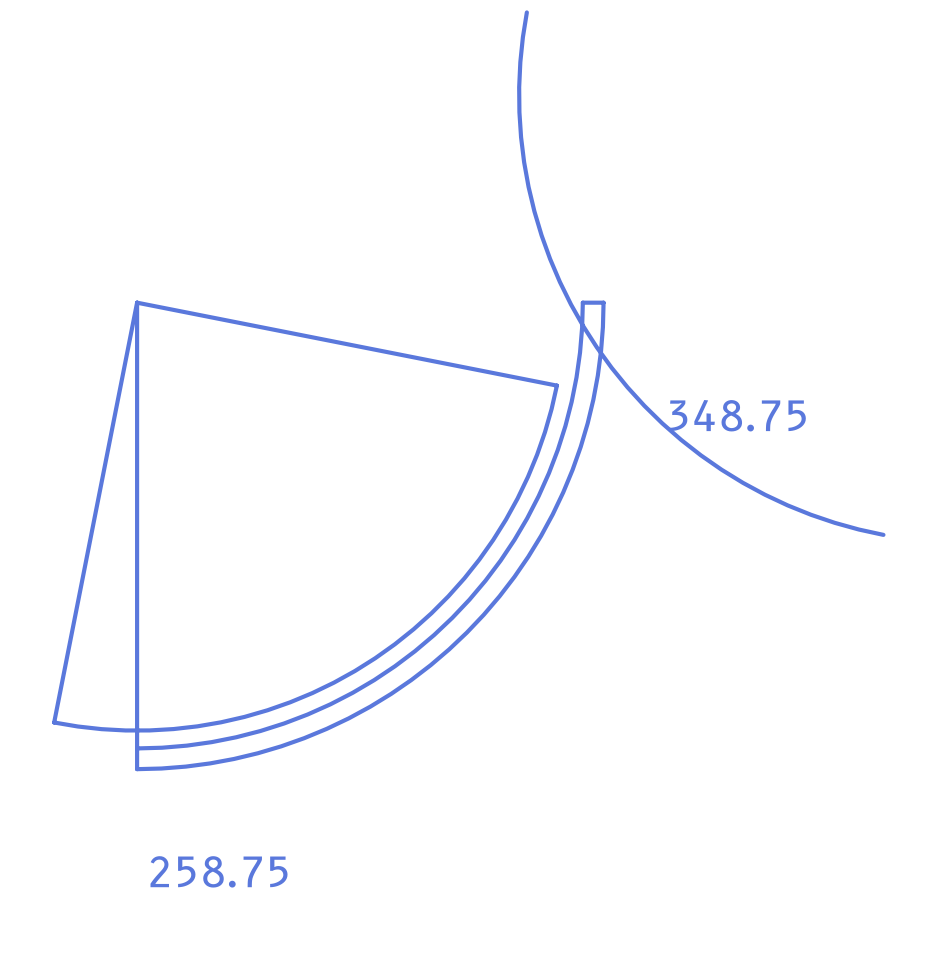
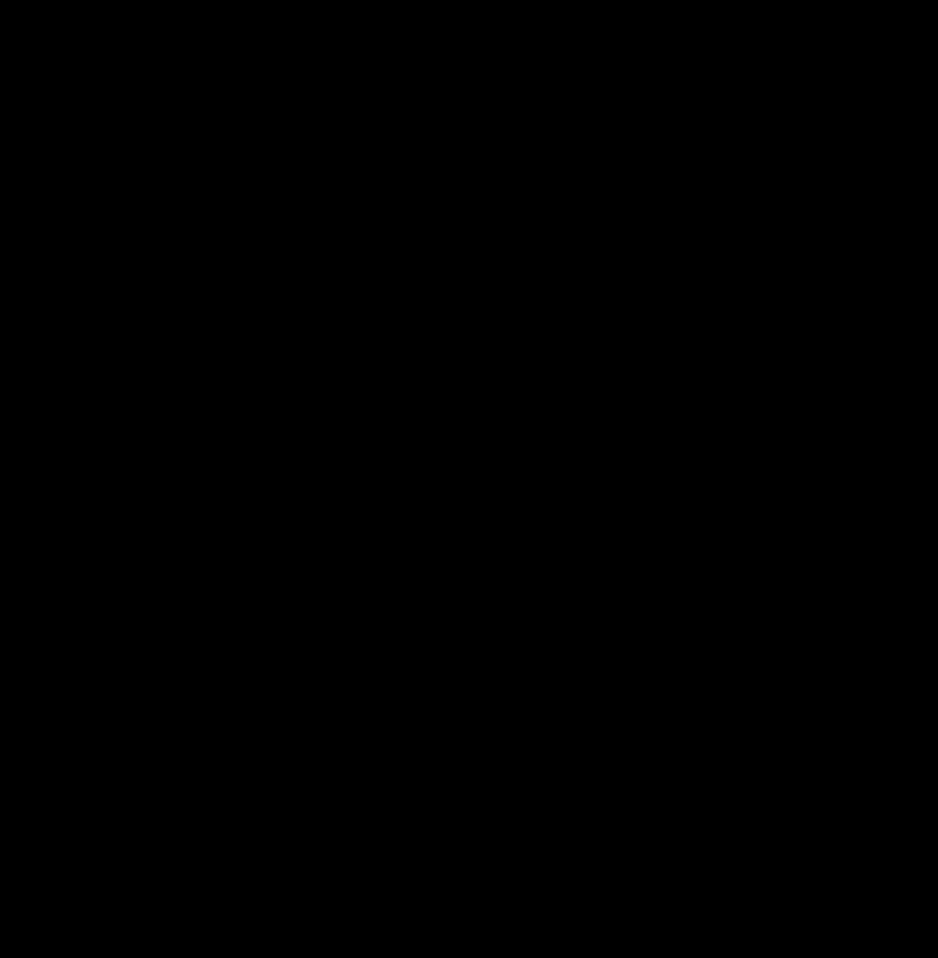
bottom track: (526, 12) (520, 62) (519, 112) (528, 186) (541, 235) (559, 282) (596, 347) (627, 387) (662, 423) (721, 469) (787, 505) (834, 522) (883, 534) -> none
bottom track: (137, 302) (137, 769) (185, 766) (234, 758) (281, 746) (326, 728) (370, 706) (411, 680) (466, 632) (499, 596) (528, 556) (552, 514) (572, 469) (587, 423) (597, 375) (603, 302) (582, 302) (580, 352) (571, 401) (557, 449) (538, 496) (500, 560) (452, 617) (395, 666) (352, 692) (307, 714) (236, 737) (187, 745) (162, 747) (137, 748) -> none
bottom track: (137, 302) (54, 722) (125, 730) (173, 729) (221, 722) (290, 702) (334, 682) (375, 658) (431, 613) (464, 578) (493, 539) (517, 498) (537, 454) (556, 385) (137, 302) -> none
text: 348.75 (737, 415) -> none
text: 258.75 (219, 871) -> none

